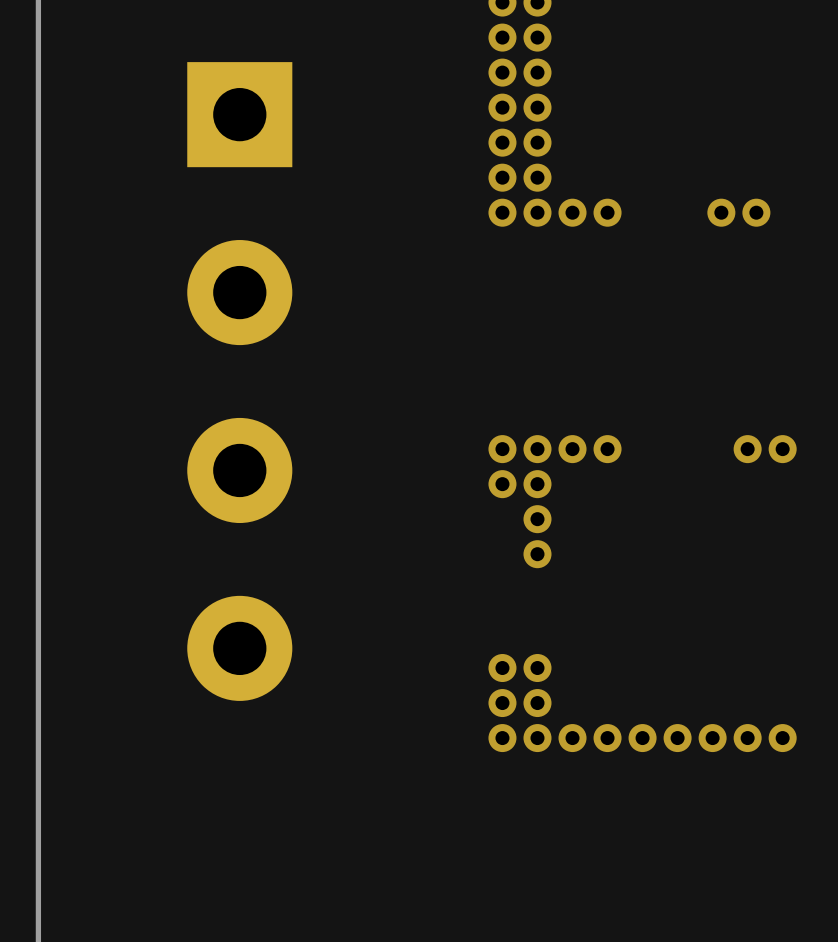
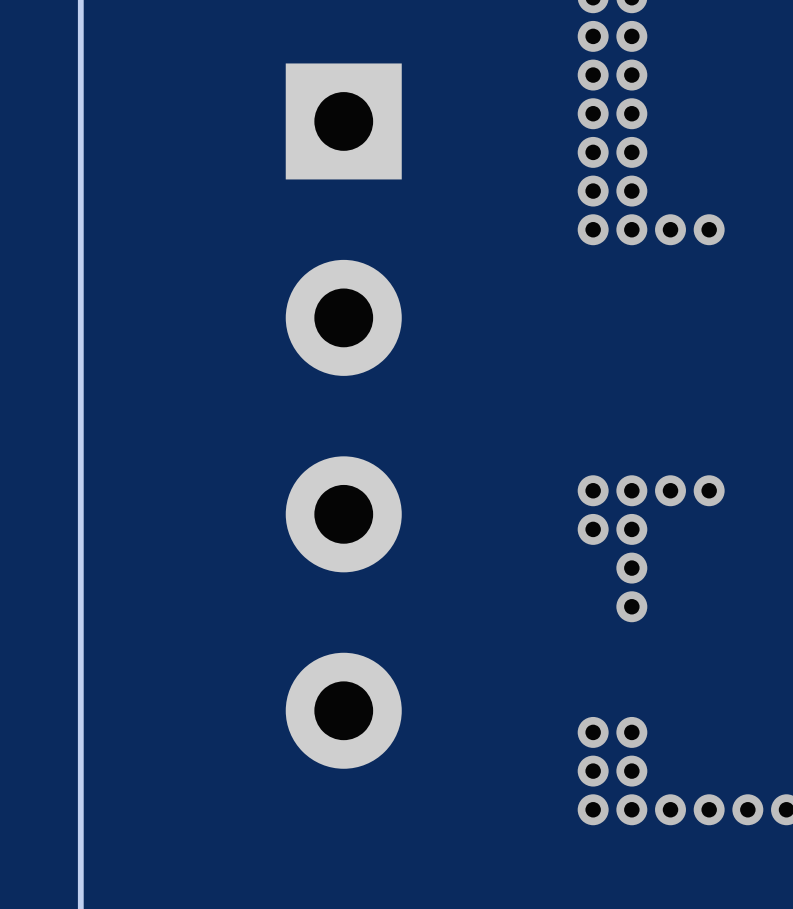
part position: (239, 381) -> (343, 416)

